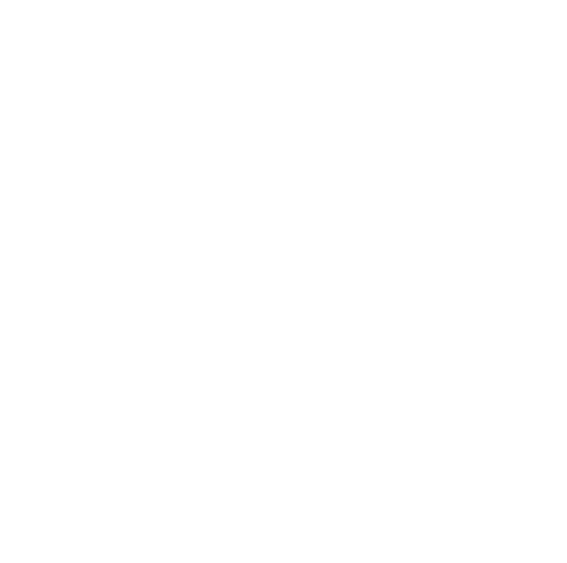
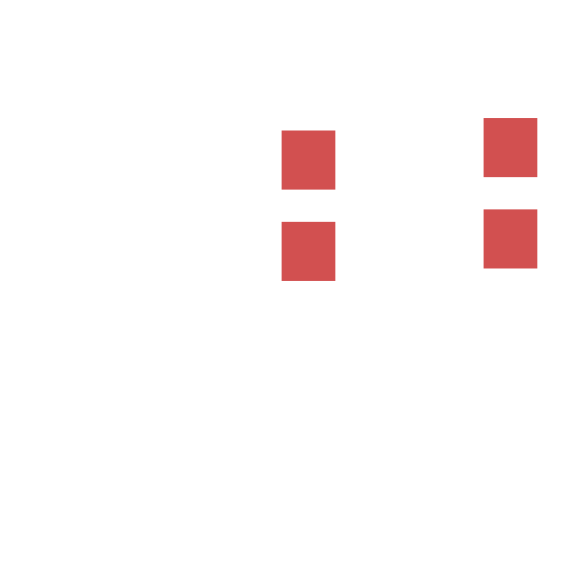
part: none -> (510, 193)
part: none -> (308, 205)

